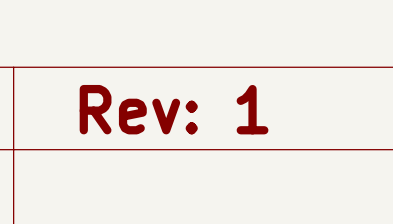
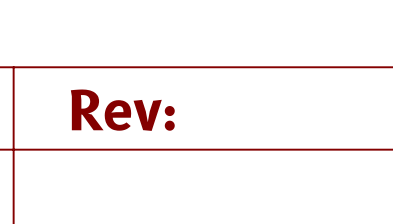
title block: Rev: 1 (174, 109) -> Rev: (122, 110)

